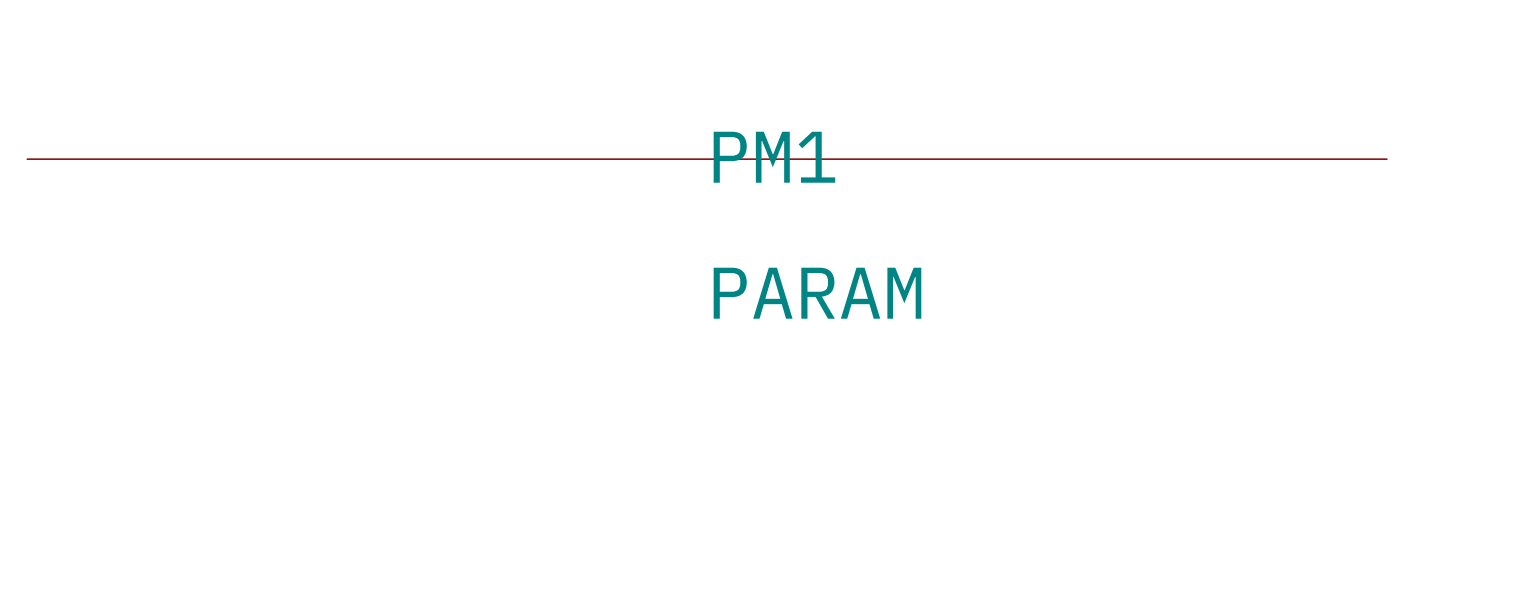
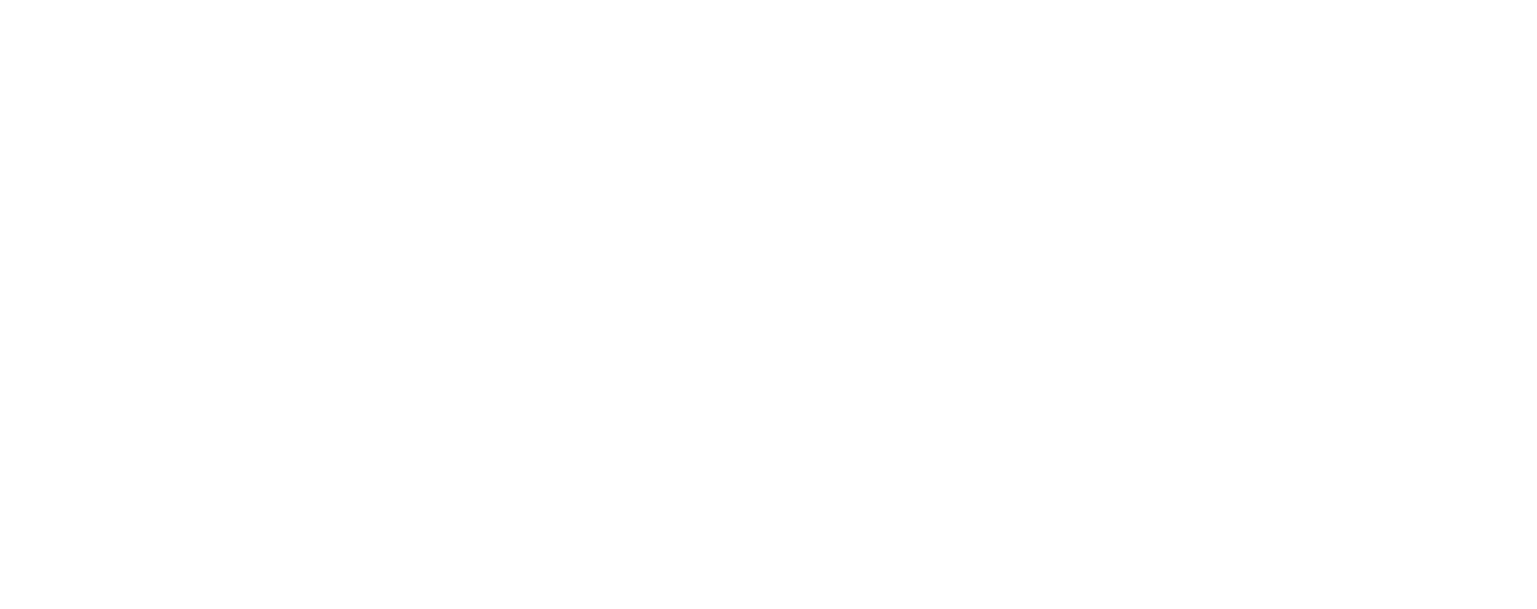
PM1: PARAM (707, 159) -> none

